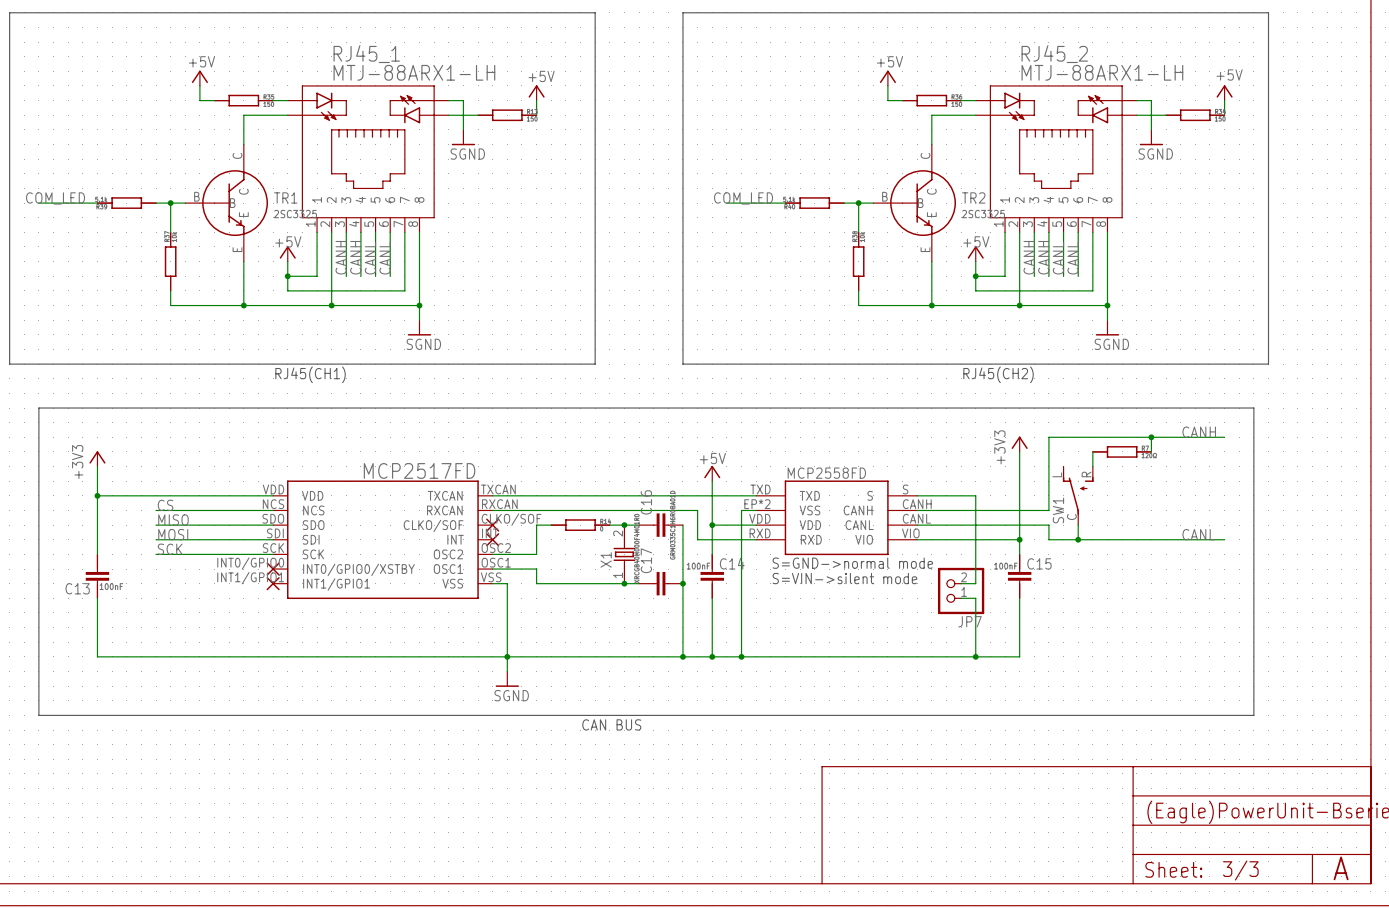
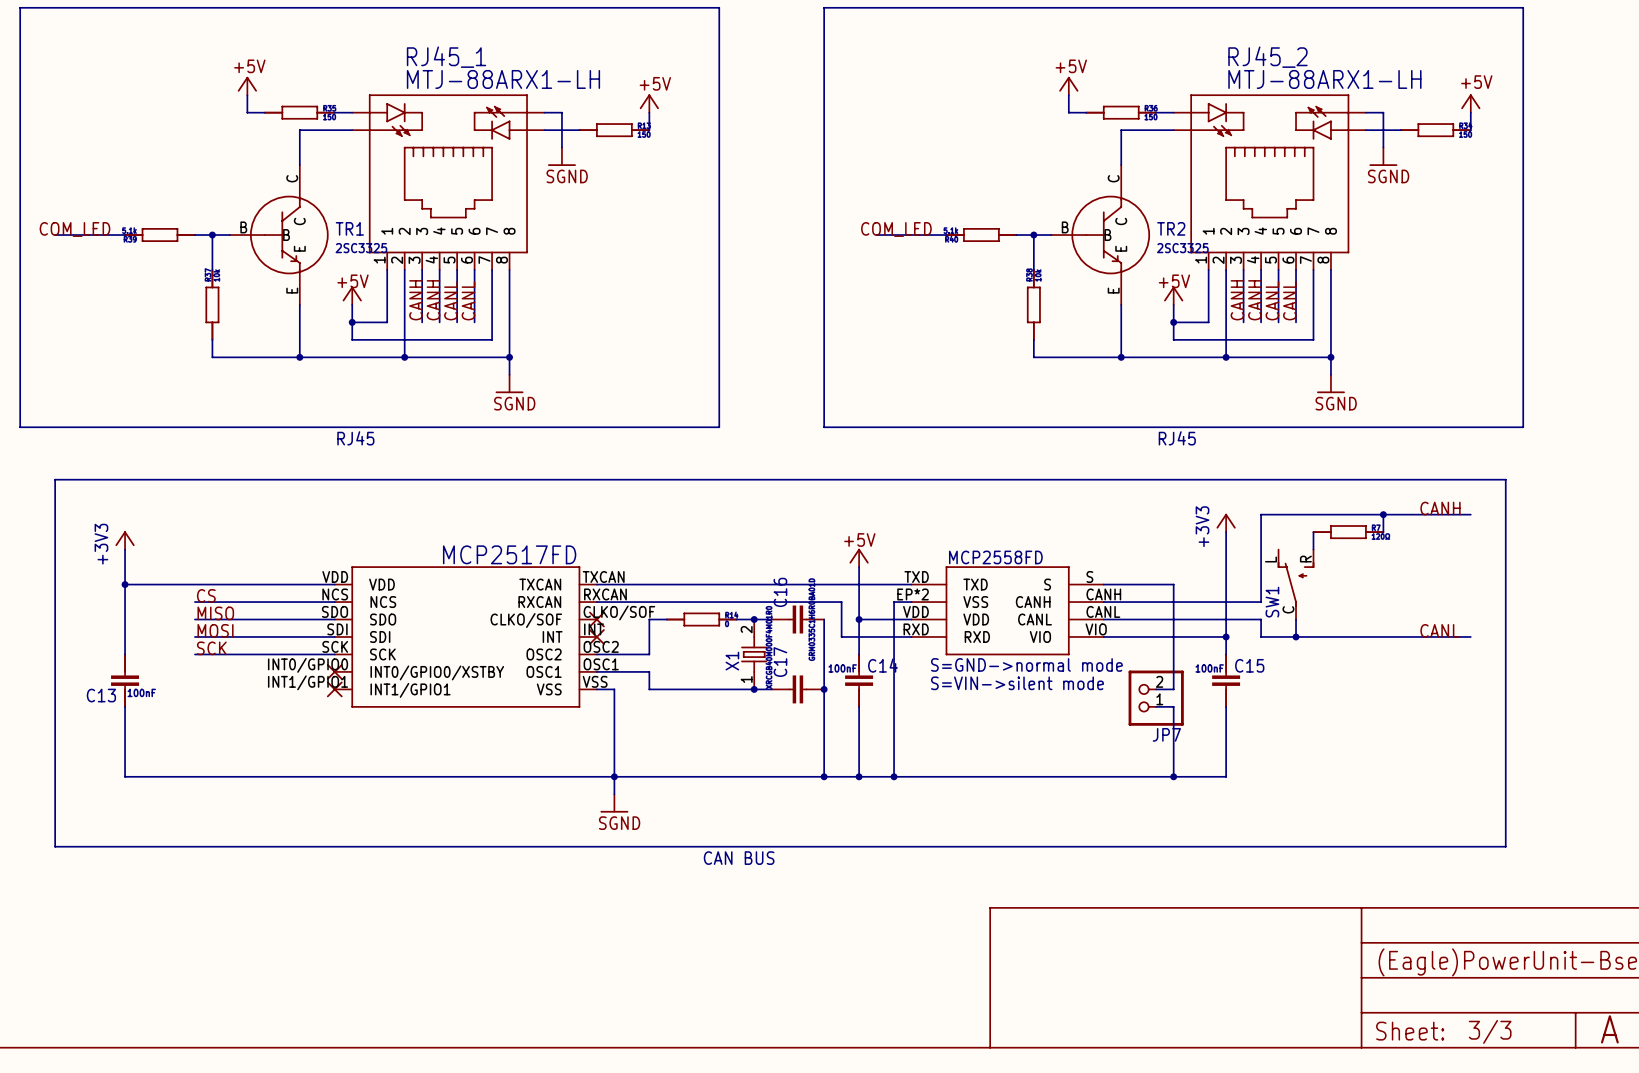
text: RJ45(CH1) (310, 374) -> RJ45 (355, 438)
text: RJ45(CH2) (998, 374) -> RJ45 (1177, 438)

